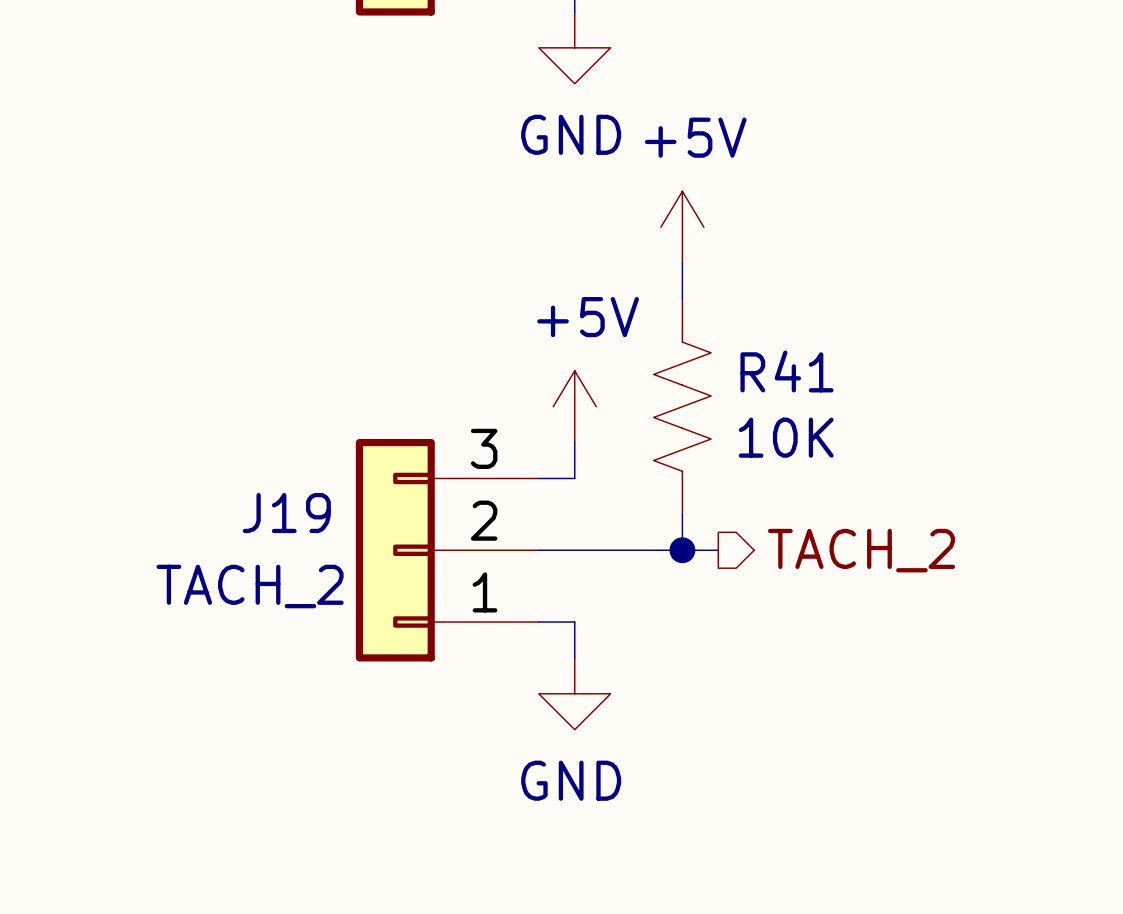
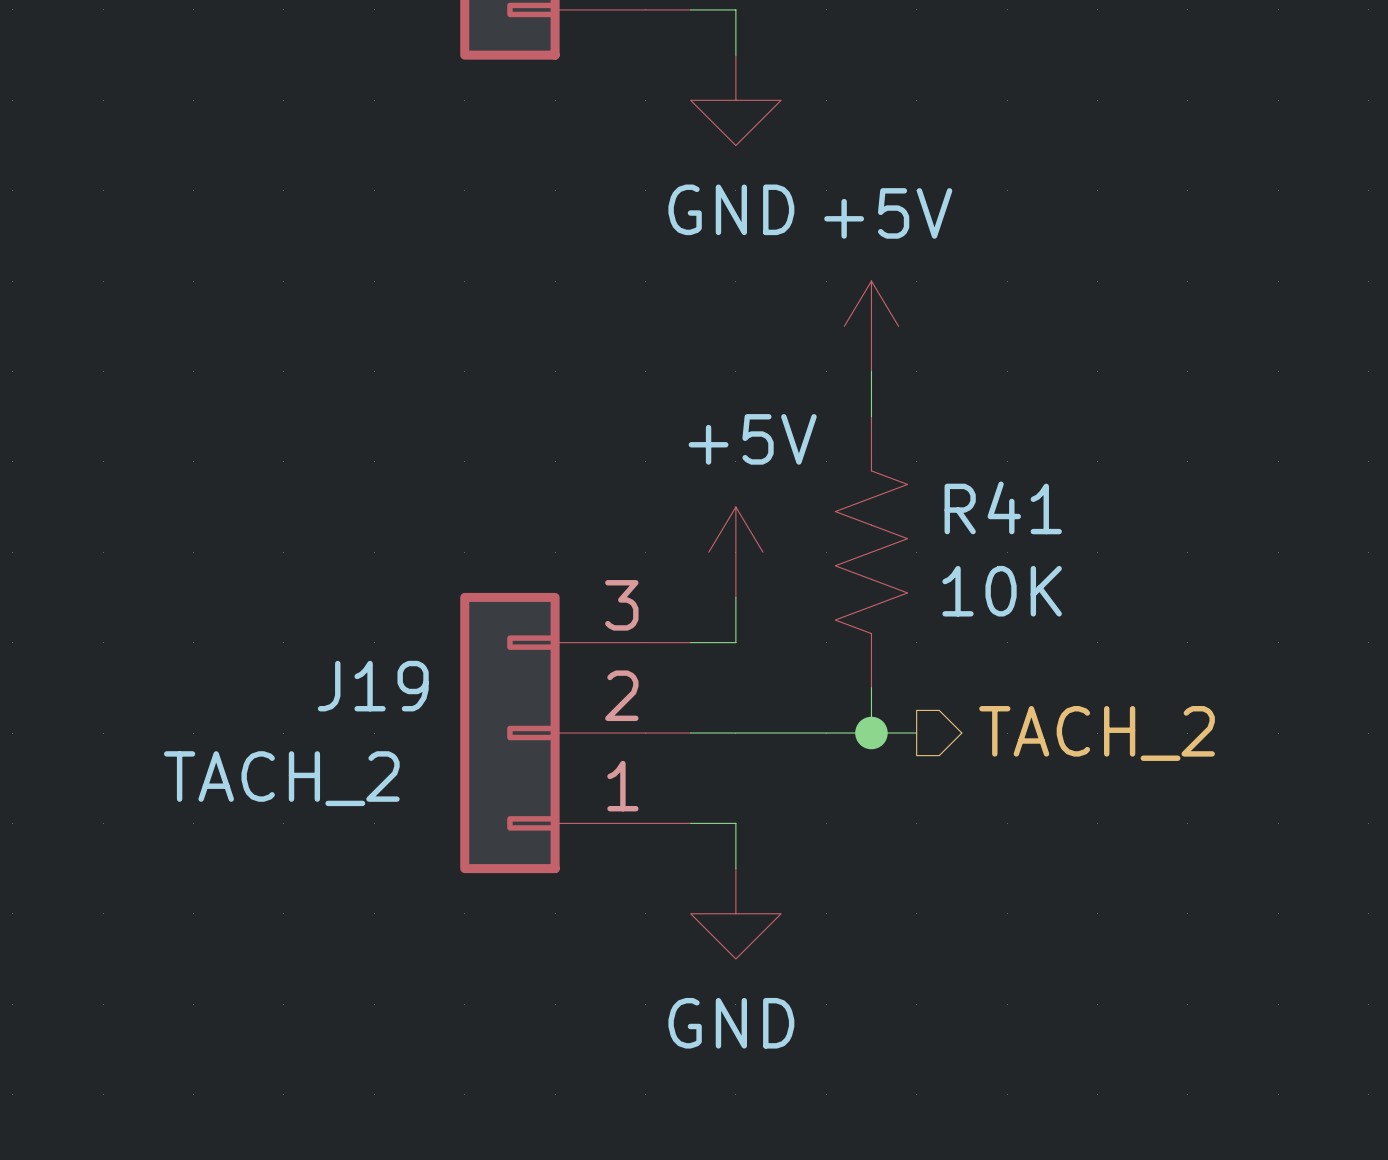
J19 value position: TACH_2 (250, 586) -> TACH_2 (281, 778)

